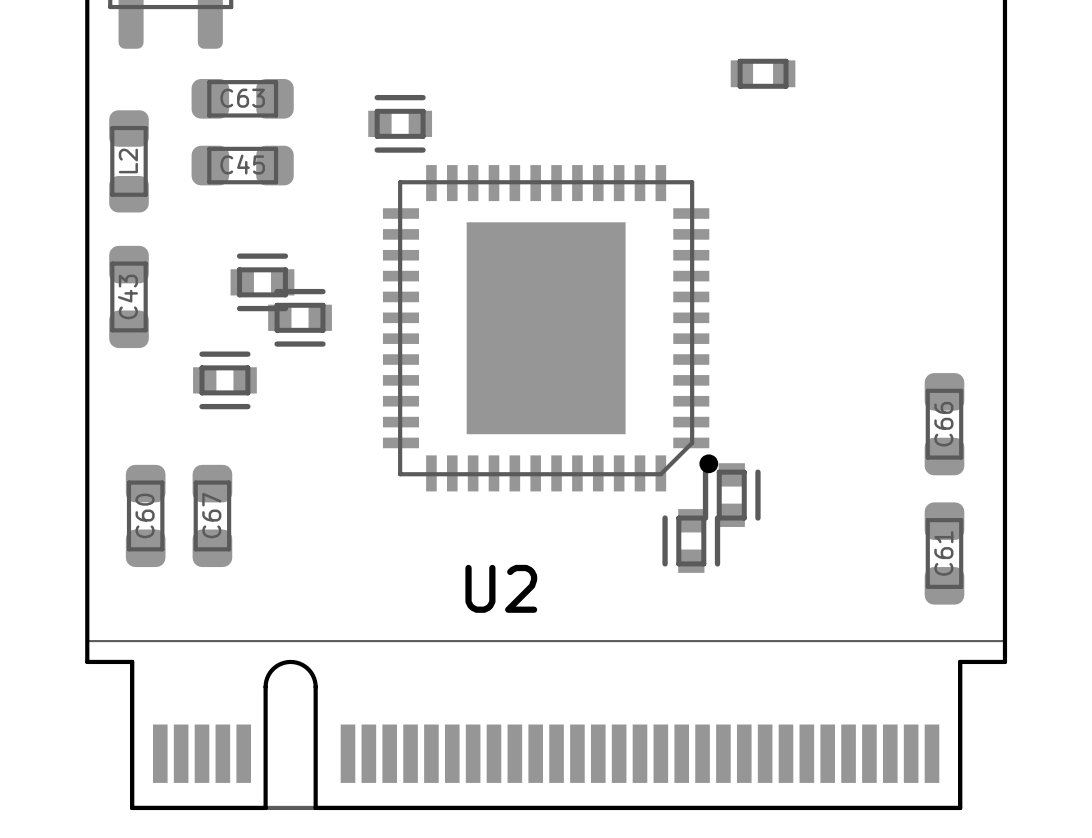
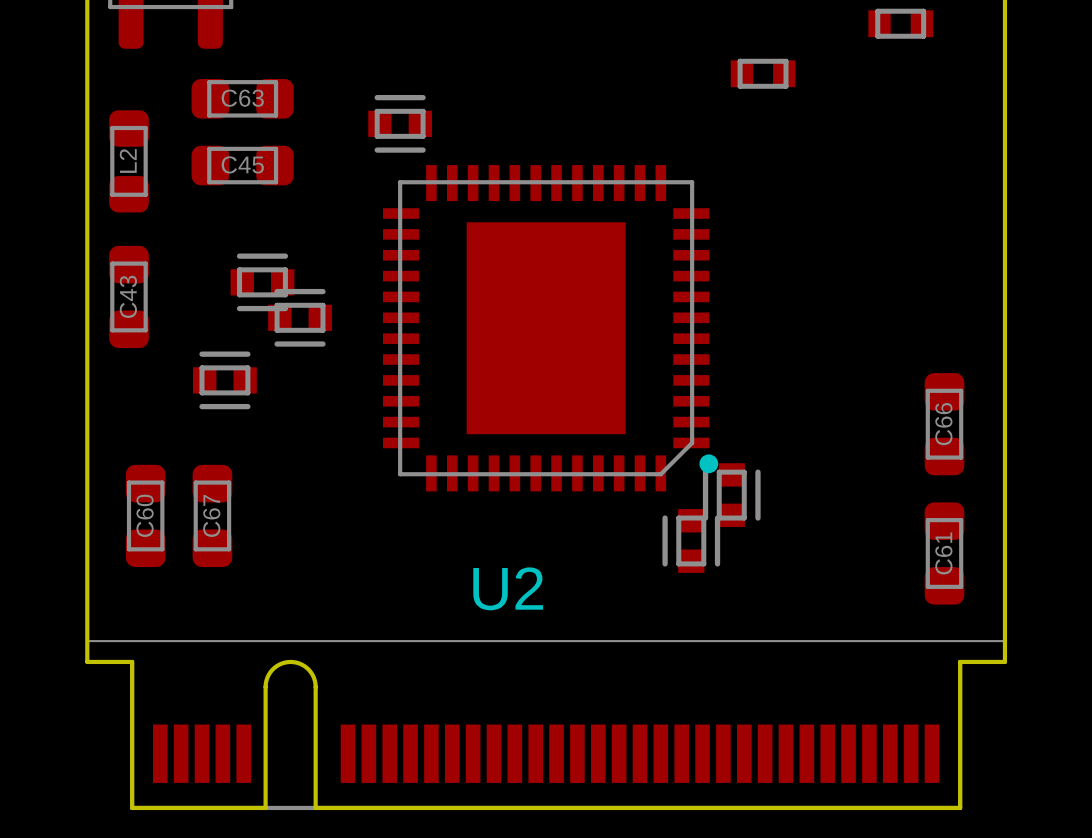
part: none -> (900, 23)

